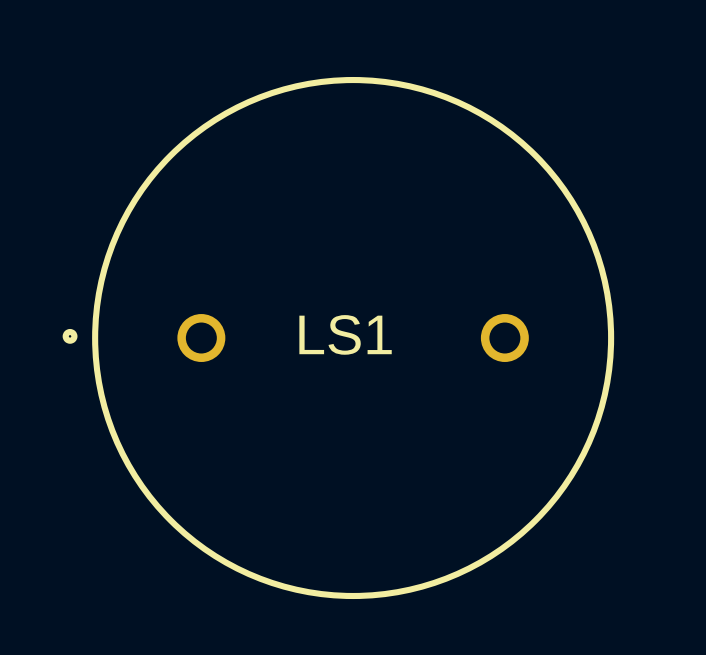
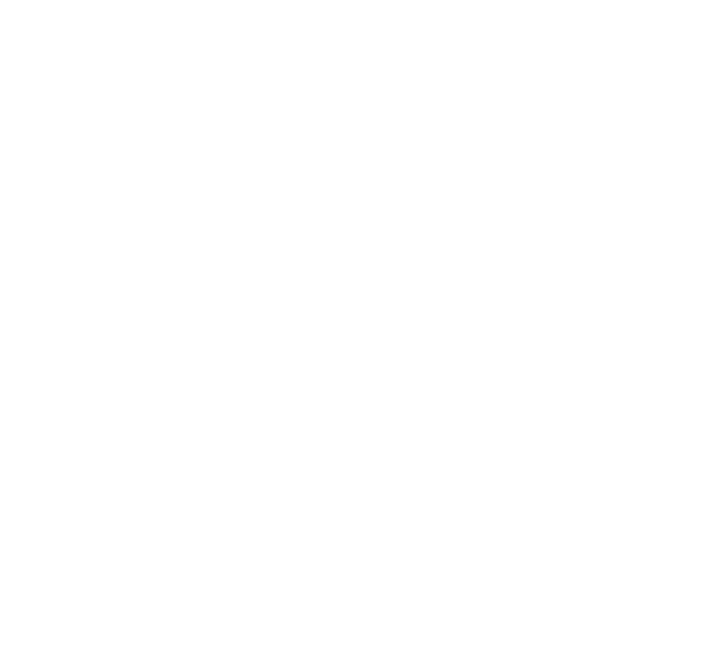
LS1: (338, 338) -> none

